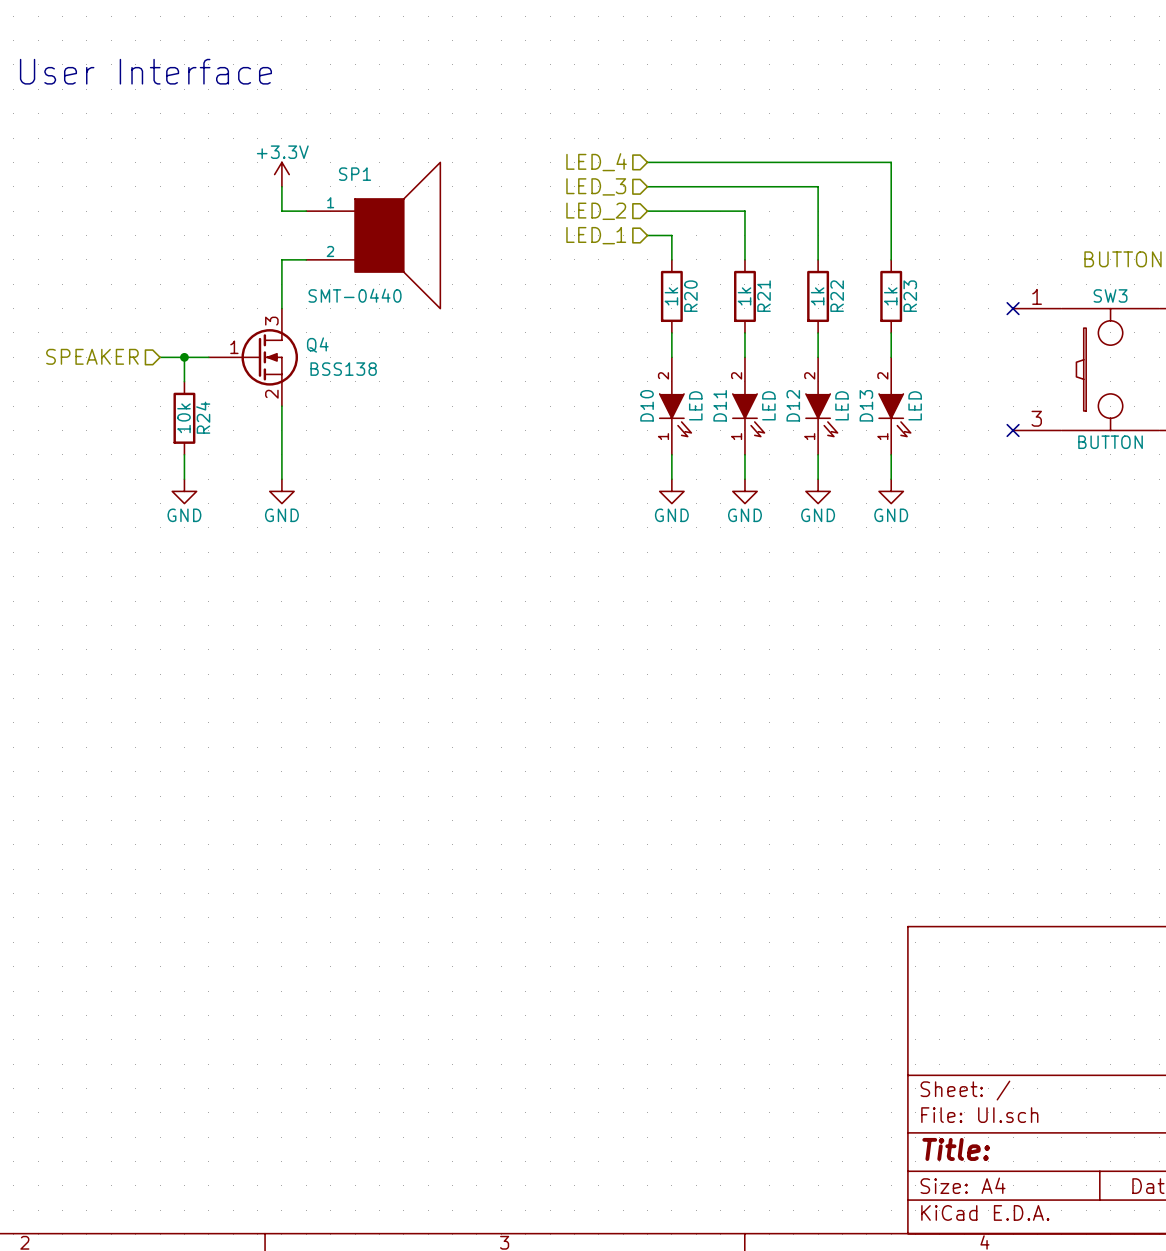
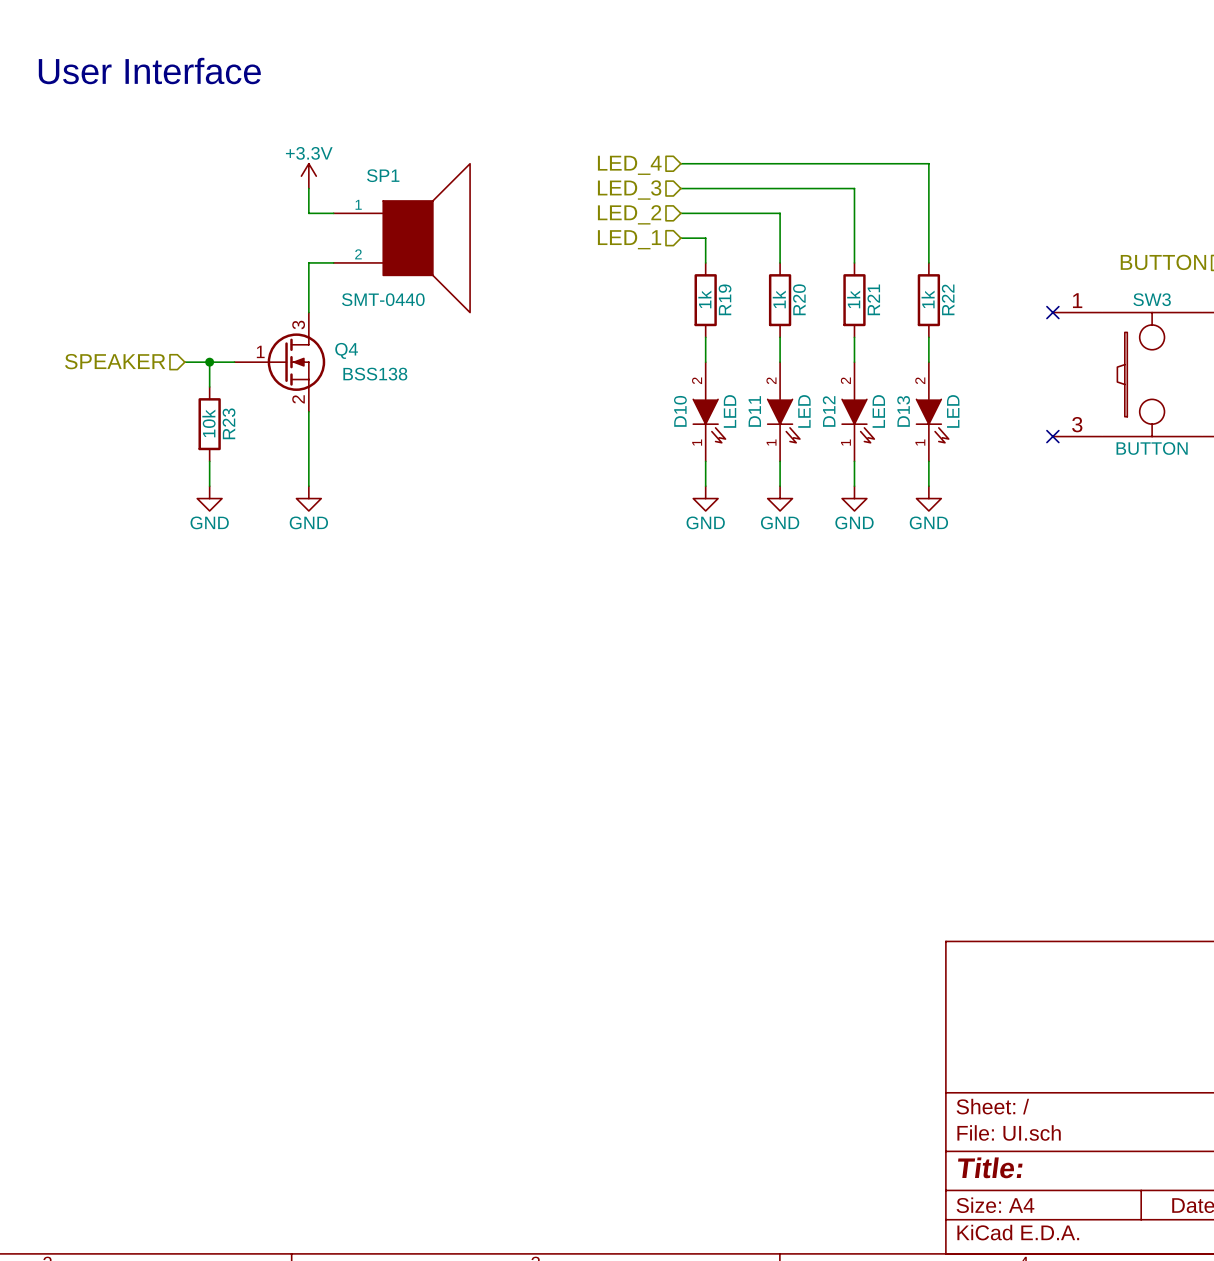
R20 name: R20 (690, 296) -> R19 (725, 299)
R21 name: R21 (764, 296) -> R20 (799, 299)
R22 name: R22 (837, 296) -> R21 (873, 299)
R23 name: R23 (910, 296) -> R22 (948, 299)
R24 name: R24 (203, 417) -> R23 (229, 423)

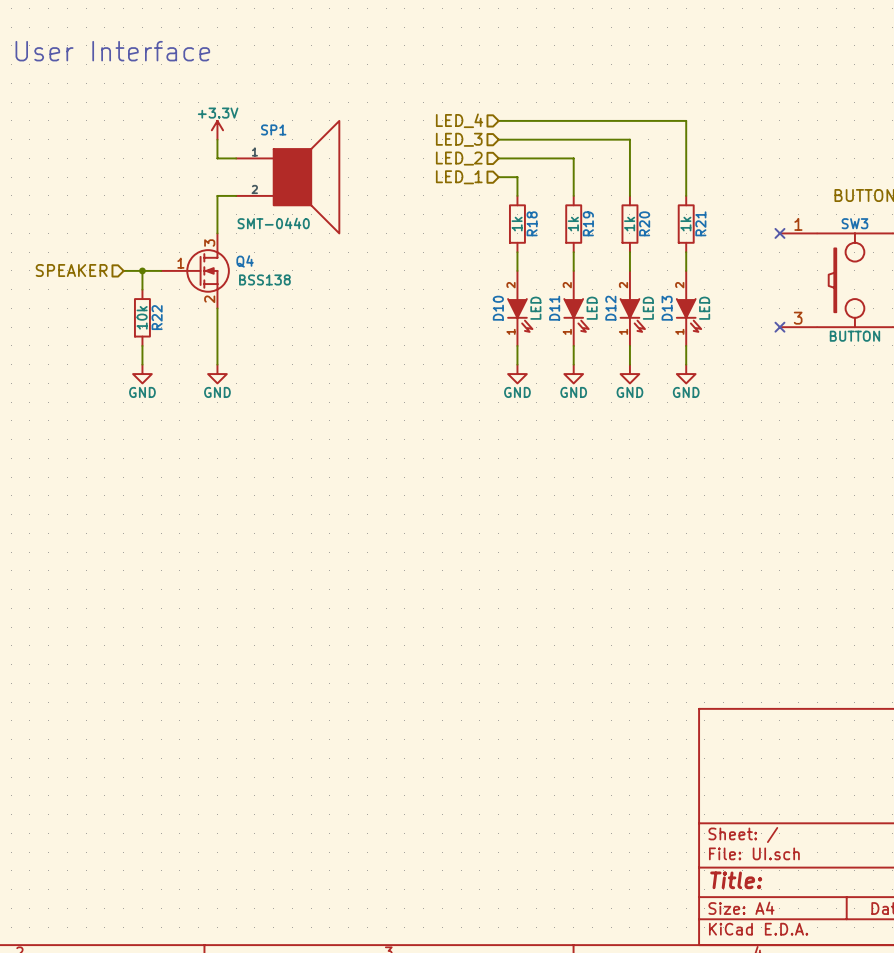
R19 name: R19 (725, 299) -> R18 (532, 223)
R20 name: R20 (799, 299) -> R19 (588, 223)
R21 name: R21 (873, 299) -> R20 (644, 223)
R22 name: R22 (948, 299) -> R21 (700, 223)
R23 name: R23 (229, 423) -> R22 (157, 317)

